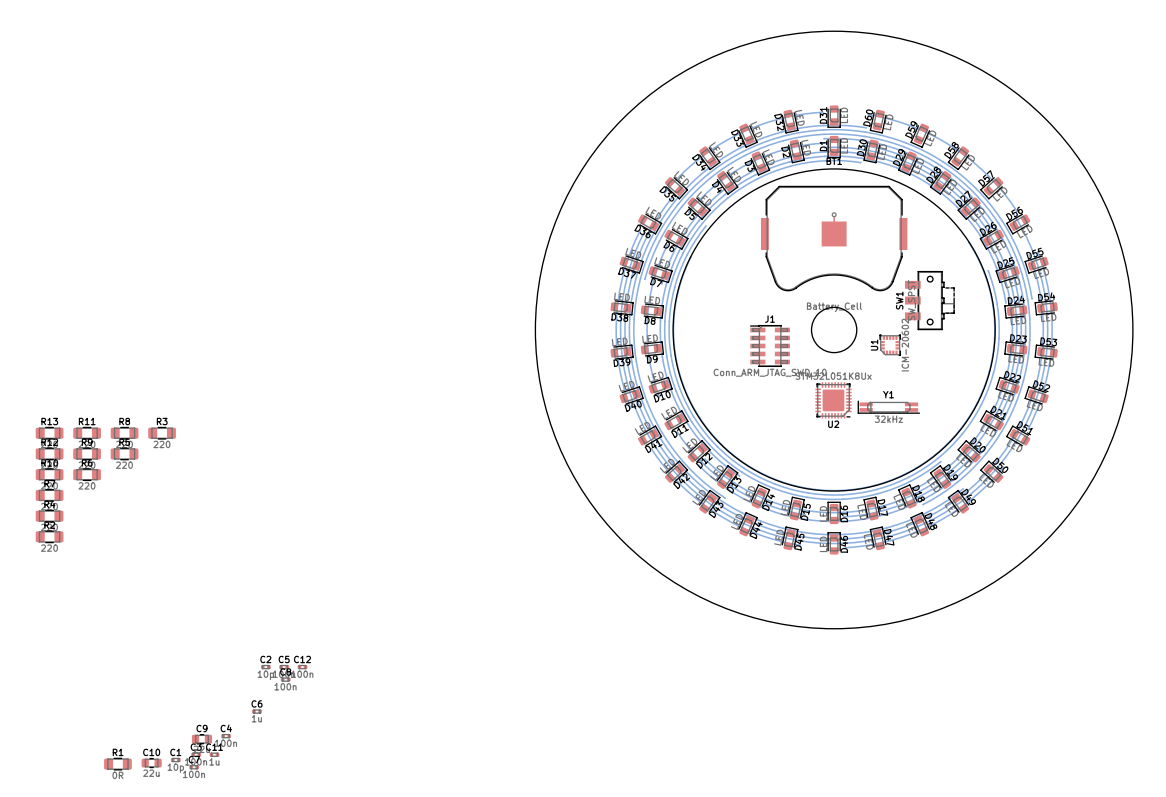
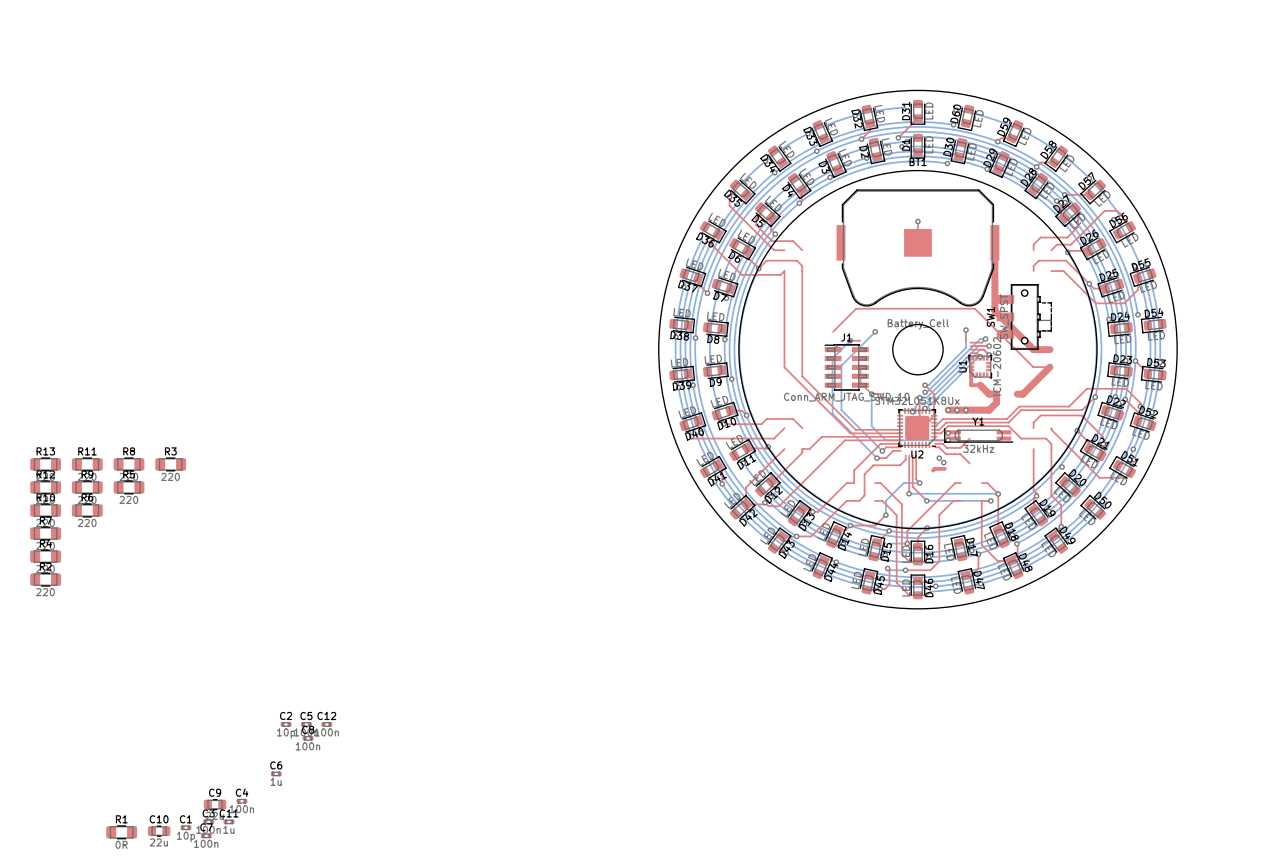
round board edge size: [535, 31, 1134, 629] -> [658, 90, 1178, 610]
via: none -> (955, 110)
via: none -> (855, 115)
top track: none -> (917, 118) (898, 137)
top track: none -> (869, 123) (869, 130) (861, 139)
via: none -> (953, 124)
via: none -> (807, 133)
bottom track: none -> (906, 136) (898, 137)
via: none -> (898, 137)
top track: none -> (1012, 138) (1001, 138) (997, 141)
via: none -> (861, 139)
via: none -> (997, 141)
via: none -> (907, 141)
via: none -> (901, 146)
via: none -> (816, 151)
via: none -> (992, 155)
via: none -> (866, 158)
via: none -> (765, 161)
top track: none -> (1053, 162) (1041, 162) (1036, 166)
via: none -> (947, 163)
via: none -> (1036, 166)
via: none -> (987, 169)
via: none -> (774, 172)
via: none -> (1031, 175)
via: none -> (830, 177)
via: none -> (1089, 178)
top track: none -> (735, 185) (735, 191) (729, 197) (729, 205) (774, 250) (784, 250)
top track: none -> (801, 189) (801, 200) (799, 203)
top track: none -> (1064, 194) (1089, 194)
via: none -> (1064, 194)
via: none -> (729, 197)
top track: none -> (1056, 201) (1061, 205) (1061, 214) (1064, 217)
via: none -> (1056, 201)
top track: none -> (1065, 202) (1070, 207) (1075, 207) (1078, 212) (1078, 226) (1067, 237) (1040, 237) (1033, 244) (1033, 250)
via: none -> (1065, 202)
via: none -> (799, 203)
top track: none -> (760, 207) (760, 214) (756, 218) (756, 225) (772, 241) (793, 241) (802, 250)
top track: none -> (771, 217) (771, 230) (775, 234)
via: none -> (1121, 217)
via: none -> (1113, 219)
top track: none -> (1130, 226) (1117, 210) (1104, 210) (1070, 244) (1056, 244) (1051, 250)
via: none -> (775, 234)
top track: none -> (717, 235) (717, 233) (709, 241) (706, 241) (706, 241) (708, 241) (741, 274) (780, 274) (784, 271) (784, 367) (850, 433) (900, 433)
top track: none -> (994, 242) (994, 310) (1033, 349) (1049, 349)
top track: none -> (746, 250) (746, 256) (758, 268) (766, 260) (796, 260) (802, 266) (802, 376) (855, 429) (900, 429)
top track: none -> (1088, 250) (1067, 252)
via: none -> (1067, 252)
top track: none -> (1135, 266) (1137, 269) (1137, 289) (1124, 303) (1095, 303) (1063, 271) (1051, 271)
via: none -> (1135, 266)
via: none -> (758, 268)
top track: none -> (1033, 271) (1033, 266) (1038, 260) (1066, 260) (1094, 288) (1105, 288)
via: none -> (1112, 275)
top track: none -> (697, 278) (697, 283) (707, 293)
via: none -> (1089, 283)
via: none -> (683, 286)
via: none -> (707, 293)
via: none -> (726, 298)
via: none -> (1137, 314)
via: none -> (1108, 319)
top track: none -> (965, 330) (965, 341)
bottom track: none -> (965, 330) (965, 347) (928, 385) (925, 385)
via: none -> (965, 330)
top track: none -> (833, 331) (856, 308) (974, 308) (1033, 367) (1049, 367) (1022, 394) (1017, 394)
bottom track: none -> (875, 331) (841, 365) (841, 410) (882, 451)
via: none -> (875, 331)
via: none -> (675, 336)
via: none -> (695, 337)
via: none -> (724, 339)
top track: none -> (985, 338) (981, 342) (970, 342)
bottom track: none -> (985, 338) (980, 338) (925, 392)
via: none -> (985, 338)
top track: none -> (850, 340) (860, 340)
bottom track: none -> (850, 340) (832, 358) (832, 413) (877, 458)
via: none -> (850, 340)
top track: none -> (970, 346) (989, 346)
bottom track: none -> (989, 346) (978, 346) (926, 397) (919, 397)
via: none -> (989, 346)
top track: none -> (970, 349) (983, 349) (989, 354)
top track: none -> (970, 353) (976, 353) (980, 356)
bottom track: none -> (989, 354) (983, 349) (980, 349) (926, 403) (919, 403) (912, 411)
via: none -> (989, 354)
bottom track: none -> (980, 356) (925, 408)
via: none -> (980, 356)
top track: none -> (965, 357) (970, 356) (971, 385) (980, 385) (989, 394) (996, 394) (996, 402) (989, 410) (948, 410)
via: none -> (1125, 360)
top track: none -> (1135, 361) (1147, 373)
via: none -> (1135, 361)
via: none -> (1160, 362)
top track: none -> (860, 367) (860, 382) (871, 394) (882, 394)
via: none -> (731, 379)
top track: none -> (925, 385) (933, 394) (933, 415) (930, 421)
via: none -> (925, 385)
via: none -> (693, 385)
via: none -> (678, 387)
via: none -> (925, 392)
bottom track: none -> (871, 394) (871, 426) (885, 440) (948, 440)
via: none -> (871, 394)
top track: none -> (1095, 397) (1082, 410) (1021, 410) (1008, 422) (946, 422) (939, 429) (935, 429)
via: none -> (1095, 397)
via: none -> (1115, 396)
top track: none -> (919, 397) (919, 421)
via: none -> (919, 397)
top track: none -> (1125, 399) (1137, 412) (1137, 421)
via: none -> (1125, 399)
via: none -> (1118, 403)
top track: none -> (1140, 406) (1140, 403) (1126, 388) (1086, 388) (1069, 406) (1019, 406) (1006, 419) (942, 419) (935, 426)
via: none -> (1140, 406)
via: none -> (925, 408)
top track: none -> (730, 410) (741, 410) (746, 415)
via: none -> (948, 410)
via: none -> (957, 410)
via: none -> (965, 410)
via: none -> (912, 411)
via: none -> (1152, 412)
top track: none -> (716, 415) (723, 424) (761, 424) (766, 419) (793, 419) (802, 428)
via: none -> (746, 415)
via: none -> (723, 424)
top track: none -> (684, 425) (684, 429) (691, 438) (774, 438) (784, 428)
top track: none -> (1033, 428) (1033, 422) (1040, 415) (1081, 415) (1103, 437) (1101, 455)
top track: none -> (1051, 428) (1099, 477) (1125, 477) (1130, 472) (1130, 462) (1133, 459)
top track: none -> (1077, 430) (1088, 442) (1088, 448)
via: none -> (1077, 430)
via: none -> (700, 432)
top track: none -> (935, 433) (941, 433) (948, 426) (1008, 426) (1021, 438) (1046, 438) (1051, 443) (1051, 495) (1061, 505) (1061, 526) (1053, 533) (1053, 536)
via: none -> (948, 433)
via: none -> (691, 436)
top track: none -> (900, 436) (821, 436) (809, 449) (802, 449) (802, 452) (771, 481) (777, 490)
top track: none -> (969, 438) (960, 447) (946, 447) (942, 443) (935, 443)
top track: none -> (900, 440) (845, 440) (779, 506) (768, 506) (764, 502) (763, 504) (746, 504) (746, 487) (784, 449)
top track: none -> (935, 440) (948, 440)
via: none -> (948, 440)
top track: none -> (900, 443) (880, 443) (854, 470) (854, 483) (846, 483) (818, 511) (801, 509)
via: none -> (1103, 444)
top track: none -> (768, 446) (746, 448)
via: none -> (768, 446)
top track: none -> (900, 447) (886, 447) (882, 451)
top track: none -> (935, 447) (939, 447) (946, 454) (960, 454) (969, 463)
top track: none -> (1033, 449) (1033, 490) (1036, 493) (1034, 498) (1034, 509)
via: none -> (1133, 449)
via: none -> (882, 451)
top track: none -> (900, 450) (893, 450) (885, 458) (877, 458)
top track: none -> (905, 455) (905, 459) (900, 465) (873, 465) (864, 474) (864, 495) (859, 500) (846, 500) (811, 536) (781, 536)
top track: none -> (909, 455) (909, 493)
top track: none -> (912, 455) (912, 486) (926, 500)
top track: none -> (916, 455) (916, 479) (919, 483)
via: none -> (877, 458)
via: none -> (939, 458)
via: none -> (1133, 459)
via: none -> (743, 462)
via: none -> (943, 462)
top track: none -> (717, 465) (722, 469) (722, 483)
via: none -> (1062, 467)
top track: none -> (944, 468) (933, 470)
via: none -> (714, 481)
via: none -> (722, 483)
top track: none -> (874, 483) (880, 483) (901, 504) (901, 554) (909, 561) (924, 561) (928, 557)
bottom track: none -> (919, 483) (903, 483) (885, 500) (885, 515)
via: none -> (919, 483)
top track: none -> (960, 483) (955, 483) (907, 531) (907, 543)
top track: none -> (981, 483) (987, 483) (998, 493) (998, 530) (1004, 530) (1007, 526)
via: none -> (777, 490)
bottom track: none -> (909, 493) (998, 493)
via: none -> (909, 493)
via: none -> (998, 493)
via: none -> (1036, 496)
via: none -> (770, 496)
top track: none -> (874, 500) (882, 500) (896, 515) (896, 582) (909, 595) (927, 595) (930, 591)
bottom track: none -> (926, 500) (990, 500)
via: none -> (926, 500)
top track: none -> (960, 500) (953, 500) (939, 515) (939, 561) (930, 570) (905, 570)
top track: none -> (990, 500) (981, 500) (981, 545) (997, 560) (1012, 560) (1017, 555) (1016, 543)
via: none -> (990, 500)
via: none -> (764, 502)
via: none -> (812, 511)
via: none -> (1048, 511)
top track: none -> (885, 515) (875, 525) (850, 525) (845, 530) (837, 530)
via: none -> (885, 515)
via: none -> (804, 524)
via: none -> (850, 525)
via: none -> (1007, 526)
via: none -> (1061, 526)
top track: none -> (927, 528) (917, 537) (917, 547)
via: none -> (927, 528)
top track: none -> (889, 530) (876, 542)
via: none -> (889, 530)
via: none -> (1012, 535)
via: none -> (796, 536)
via: none -> (843, 543)
bottom track: none -> (889, 543) (907, 543)
via: none -> (907, 543)
via: none -> (971, 543)
via: none -> (1016, 543)
top track: none -> (773, 548) (781, 548) (785, 552)
via: none -> (971, 550)
via: none -> (785, 552)
via: none -> (885, 555)
top track: none -> (978, 554) (978, 568) (971, 575) (966, 575)
via: none -> (978, 554)
via: none -> (928, 557)
via: none -> (836, 562)
top track: none -> (887, 568) (889, 570) (889, 584) (884, 589) (866, 589)
bottom track: none -> (887, 568) (889, 570) (905, 570)
via: none -> (887, 568)
via: none -> (905, 570)
via: none -> (980, 583)
via: none -> (935, 586)
via: none -> (880, 589)

